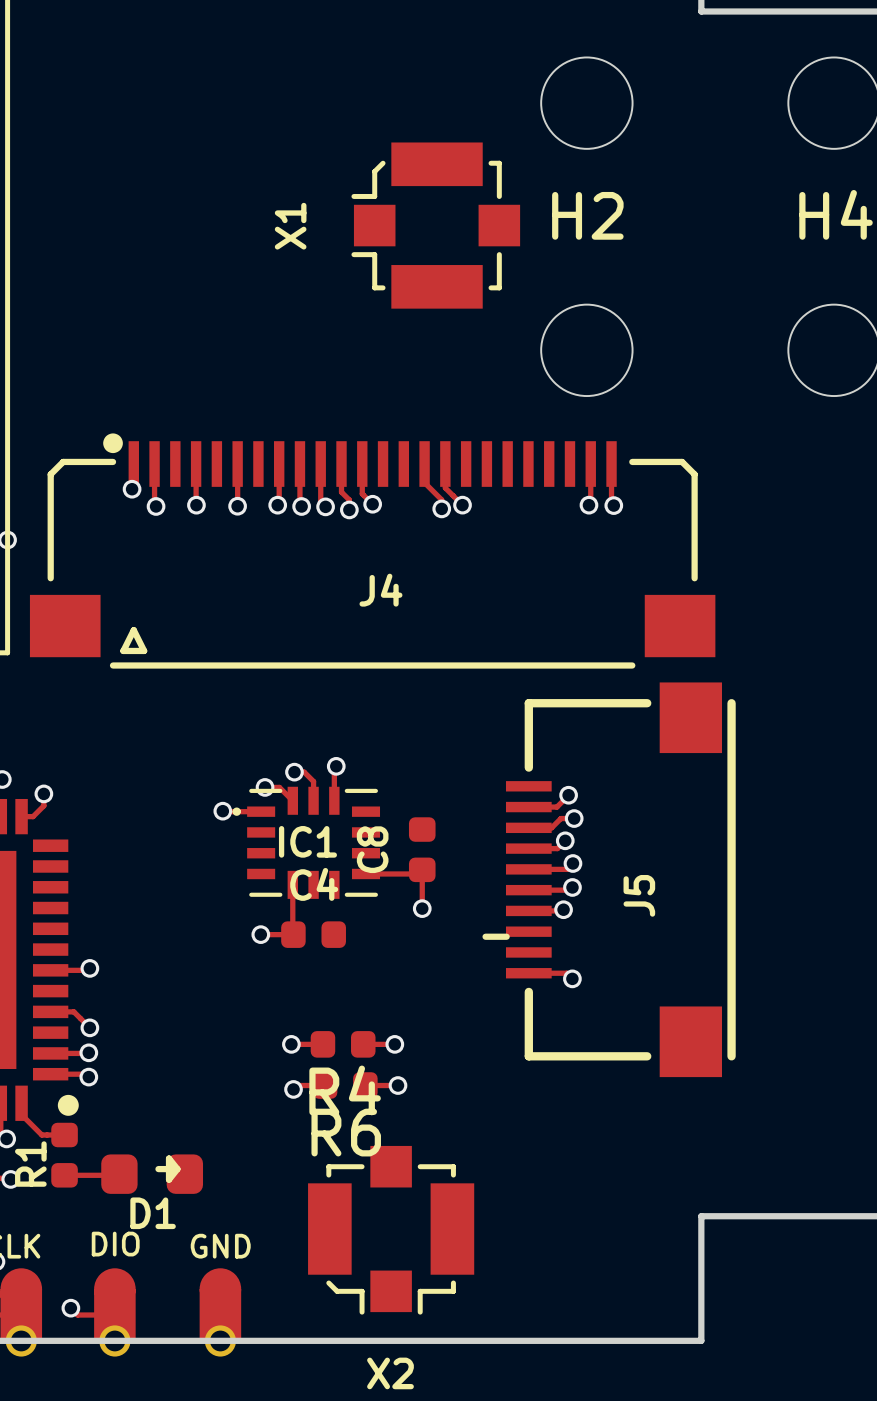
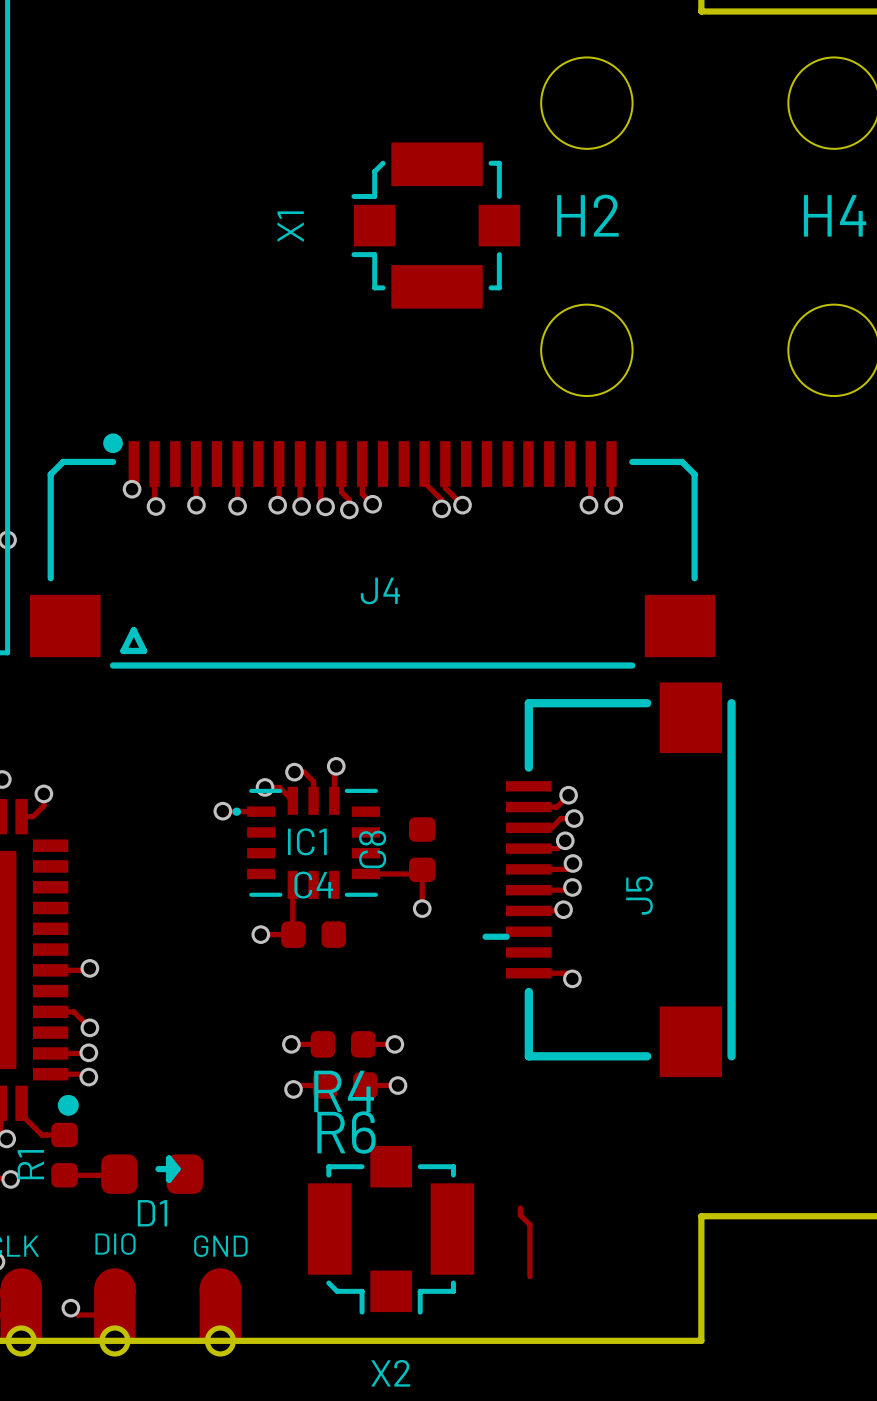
track: none -> (520, 1208) (520, 1215) (529, 1224) (529, 1276)

